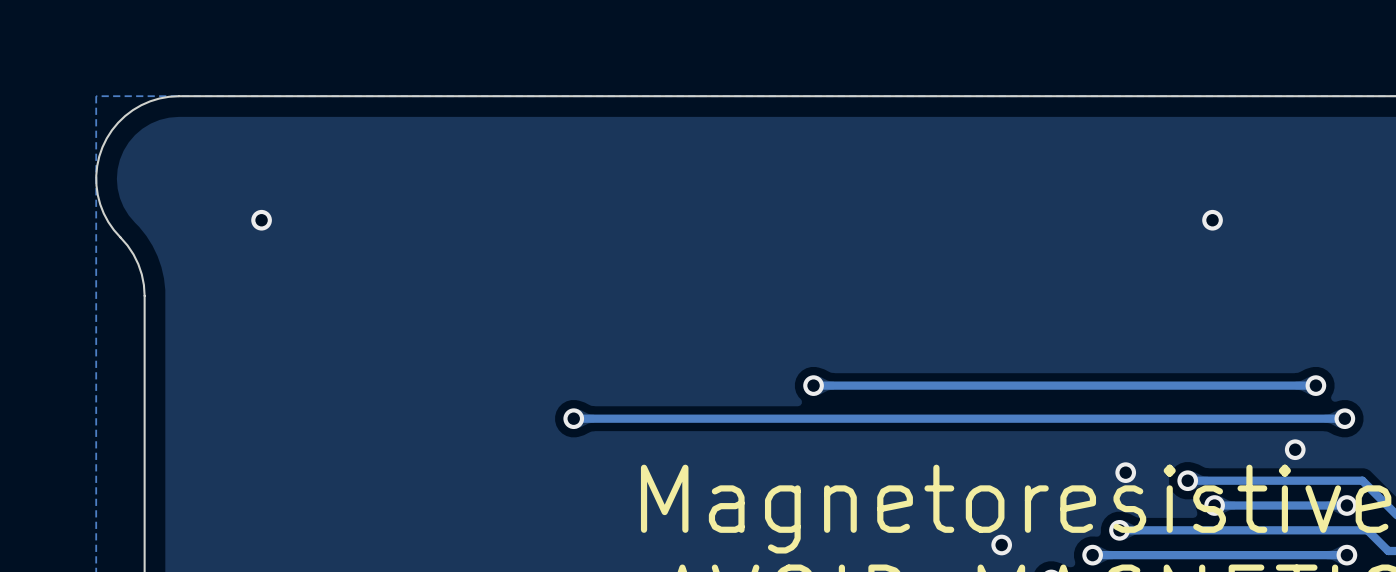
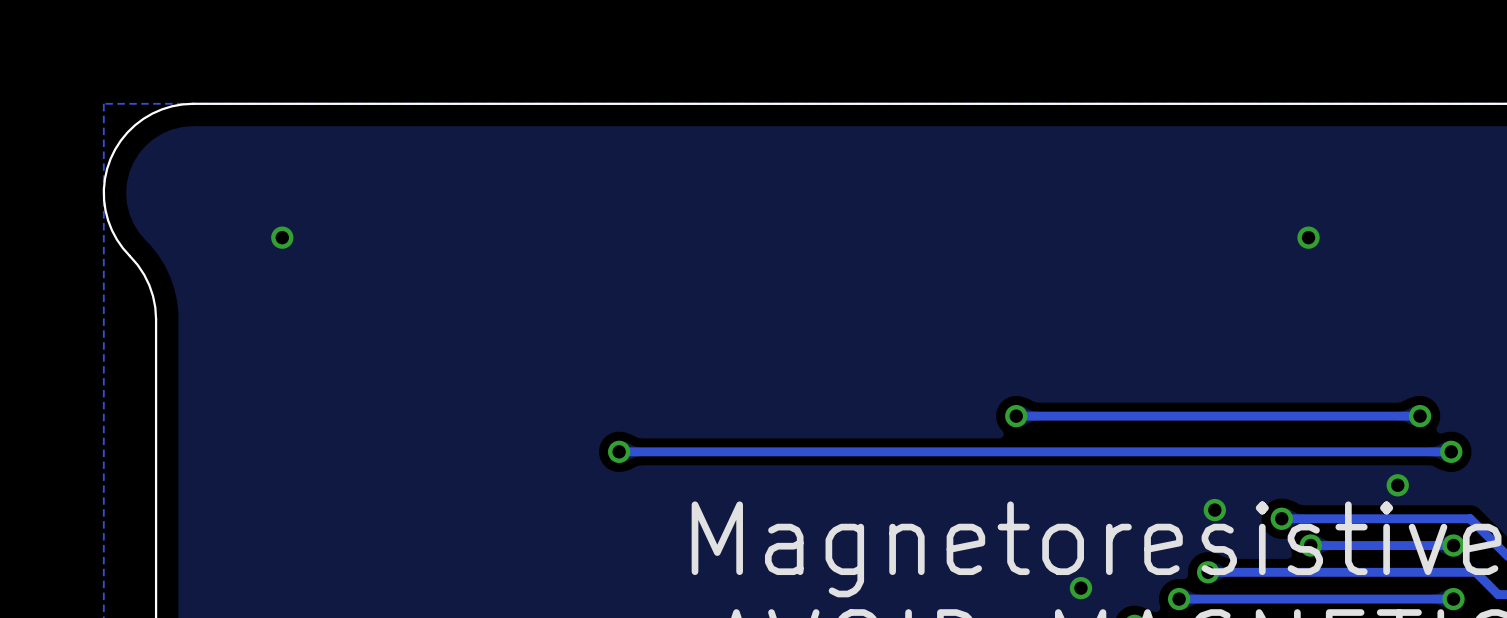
via position: (813, 385) -> (1016, 416)
track: (941, 385) (813, 385) -> none

